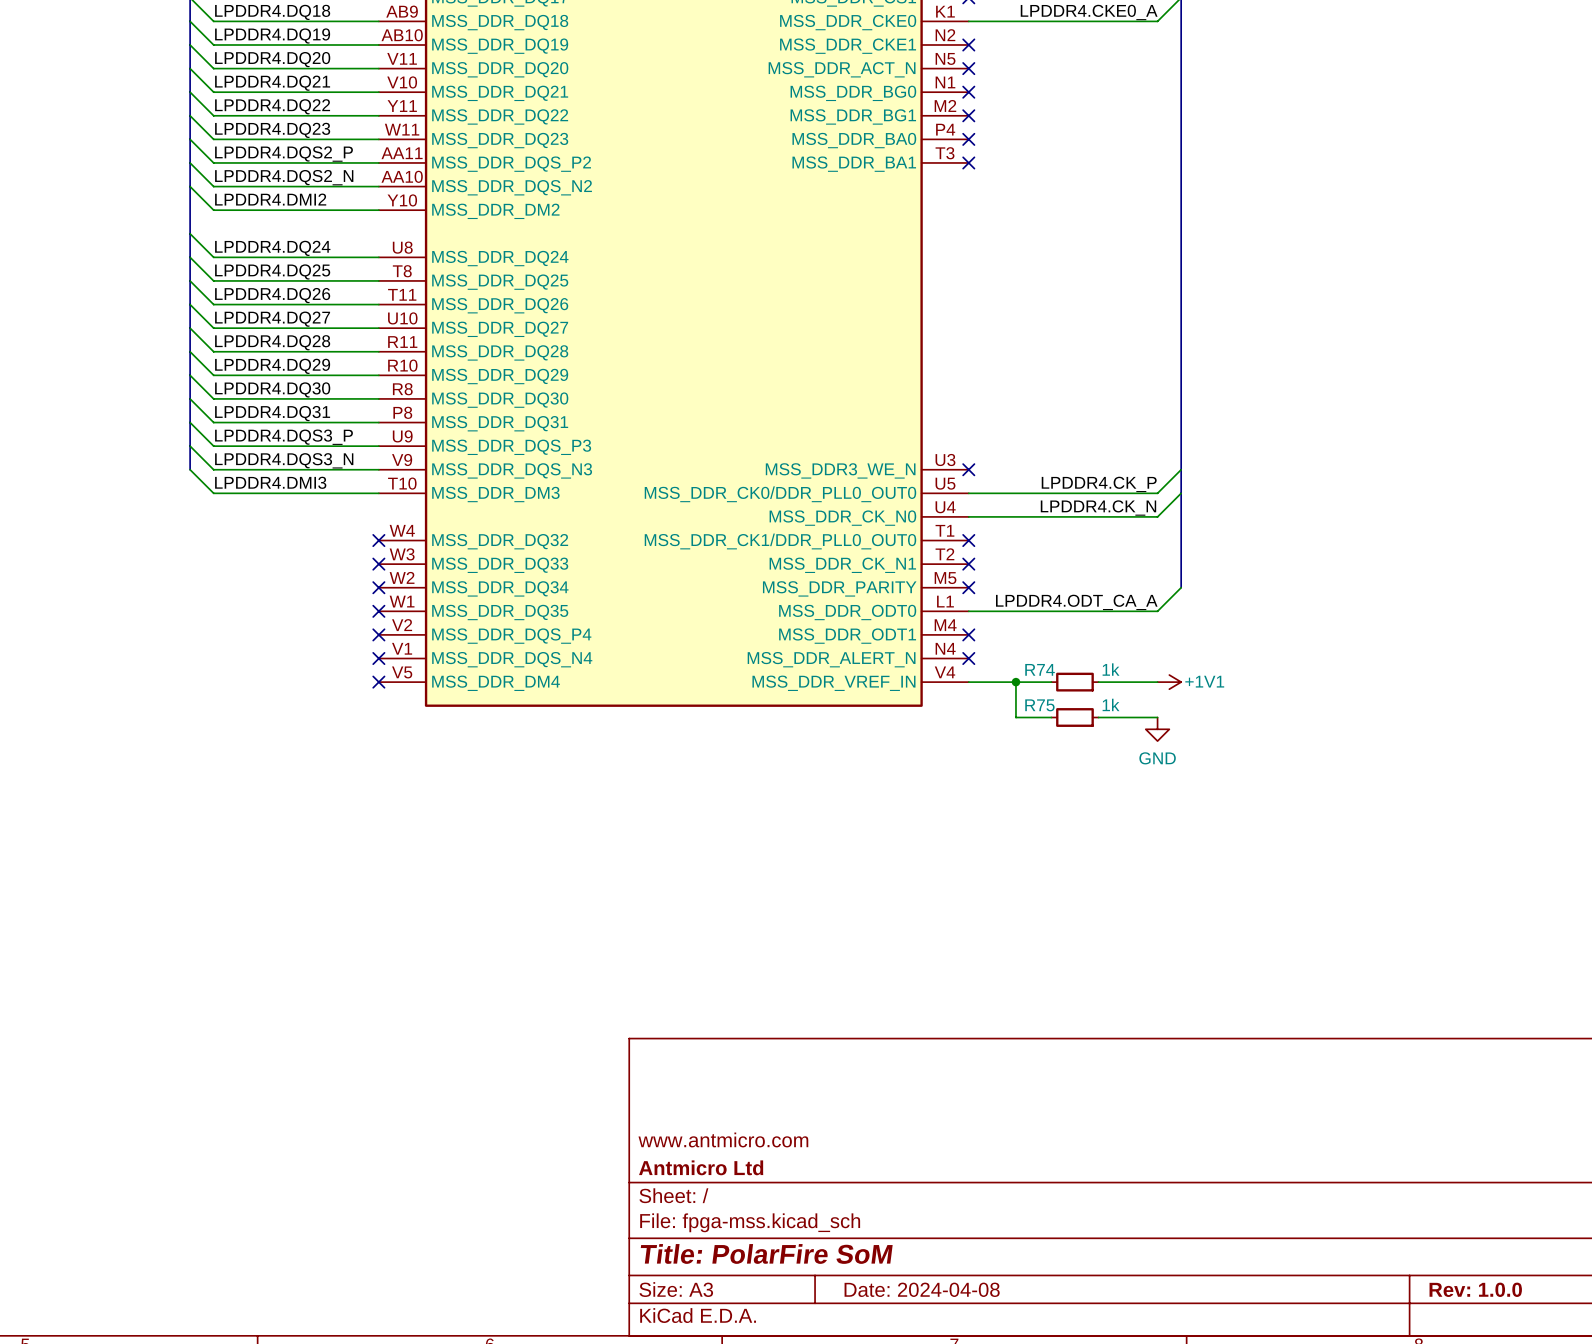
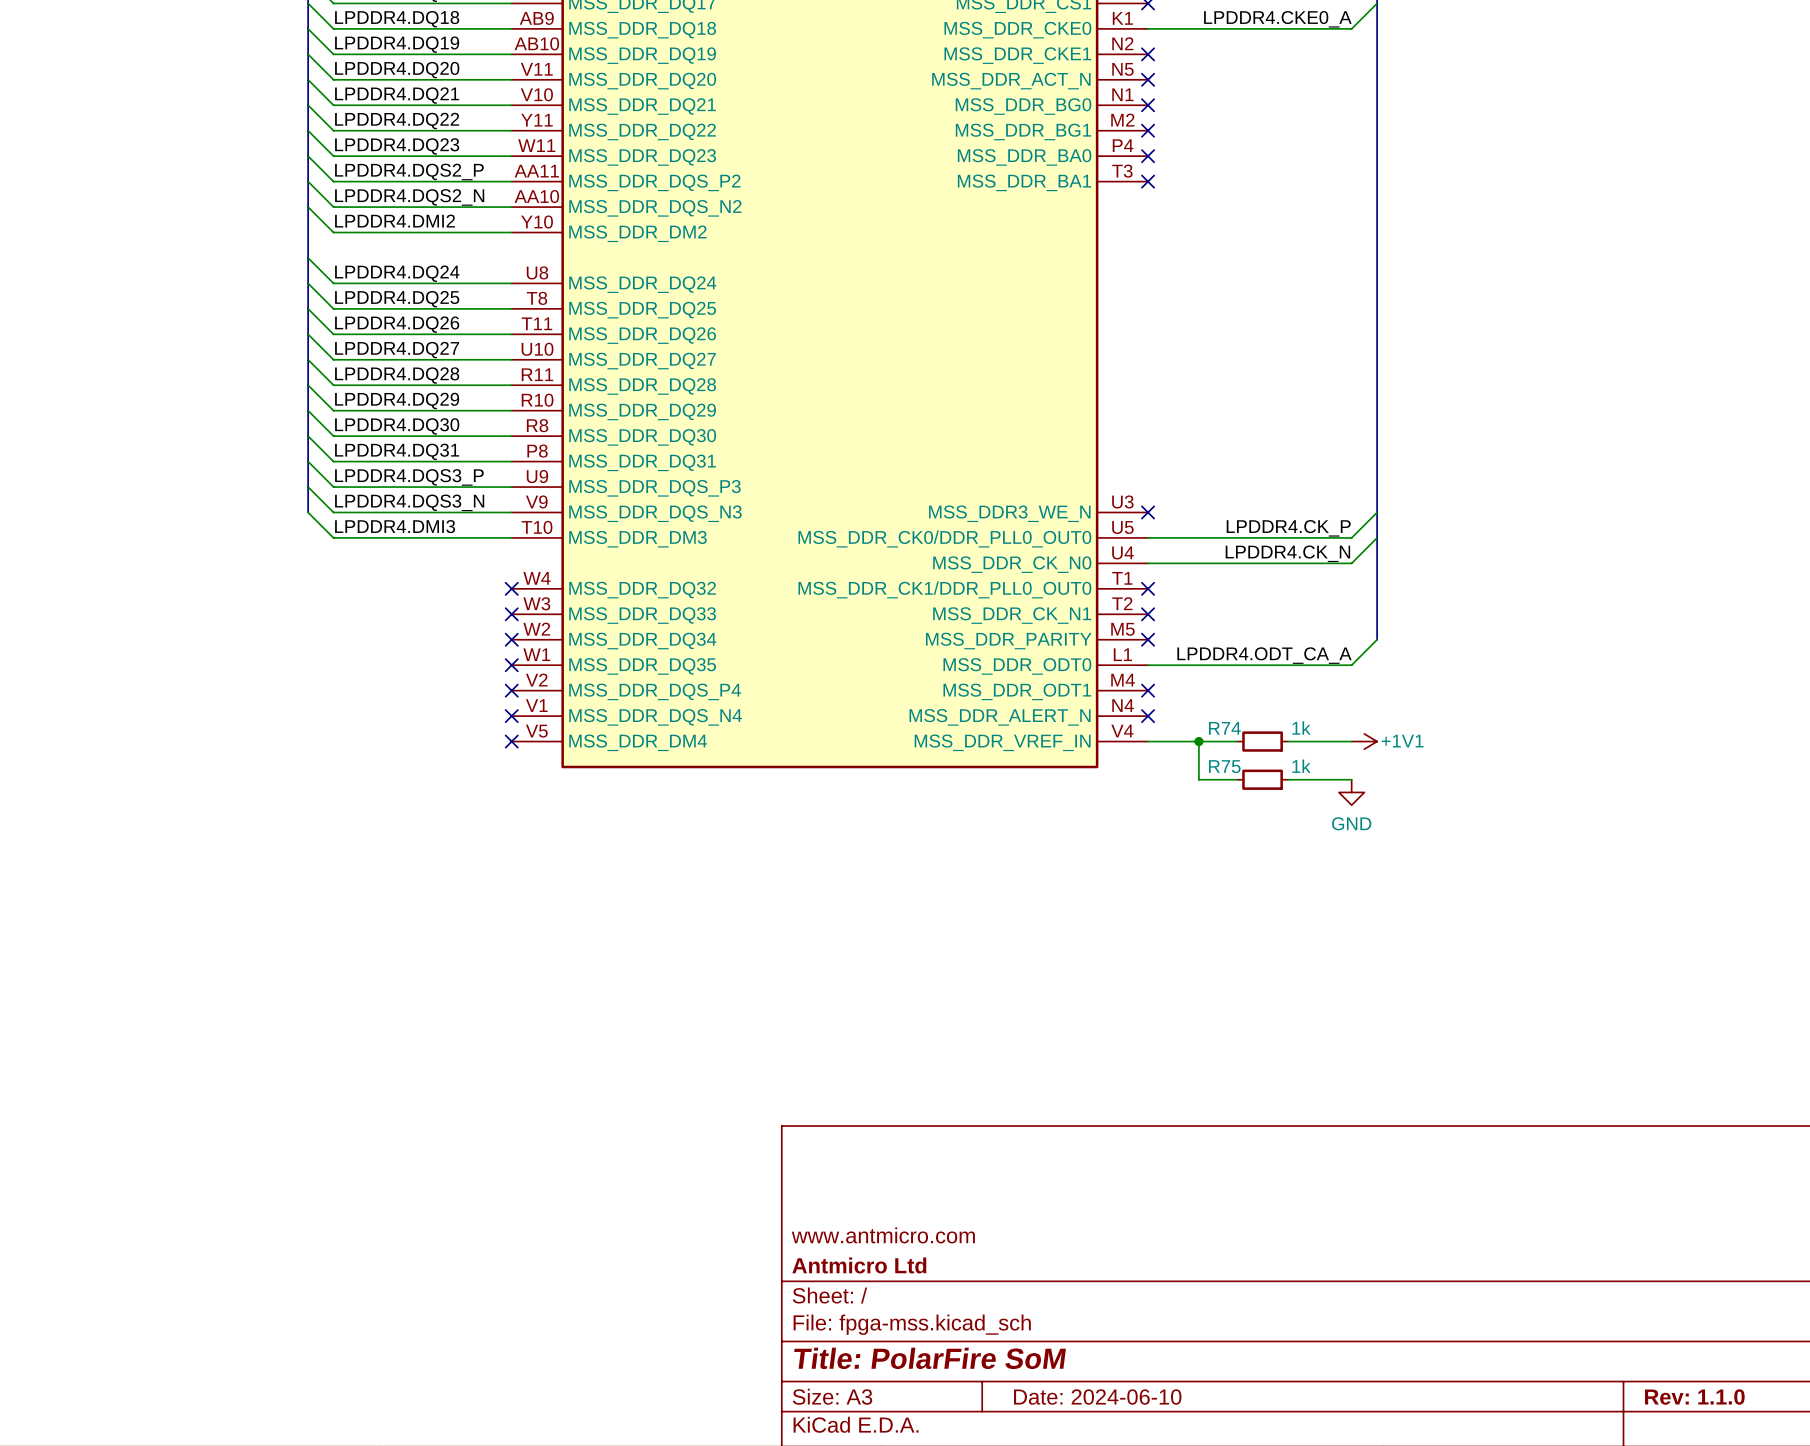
title block: Date: 2024-04-08 (922, 1289) -> Date: 2024-06-10 (1097, 1397)
title block: Rev: 1.0.0 (1475, 1289) -> Rev: 1.1.0 (1694, 1397)

